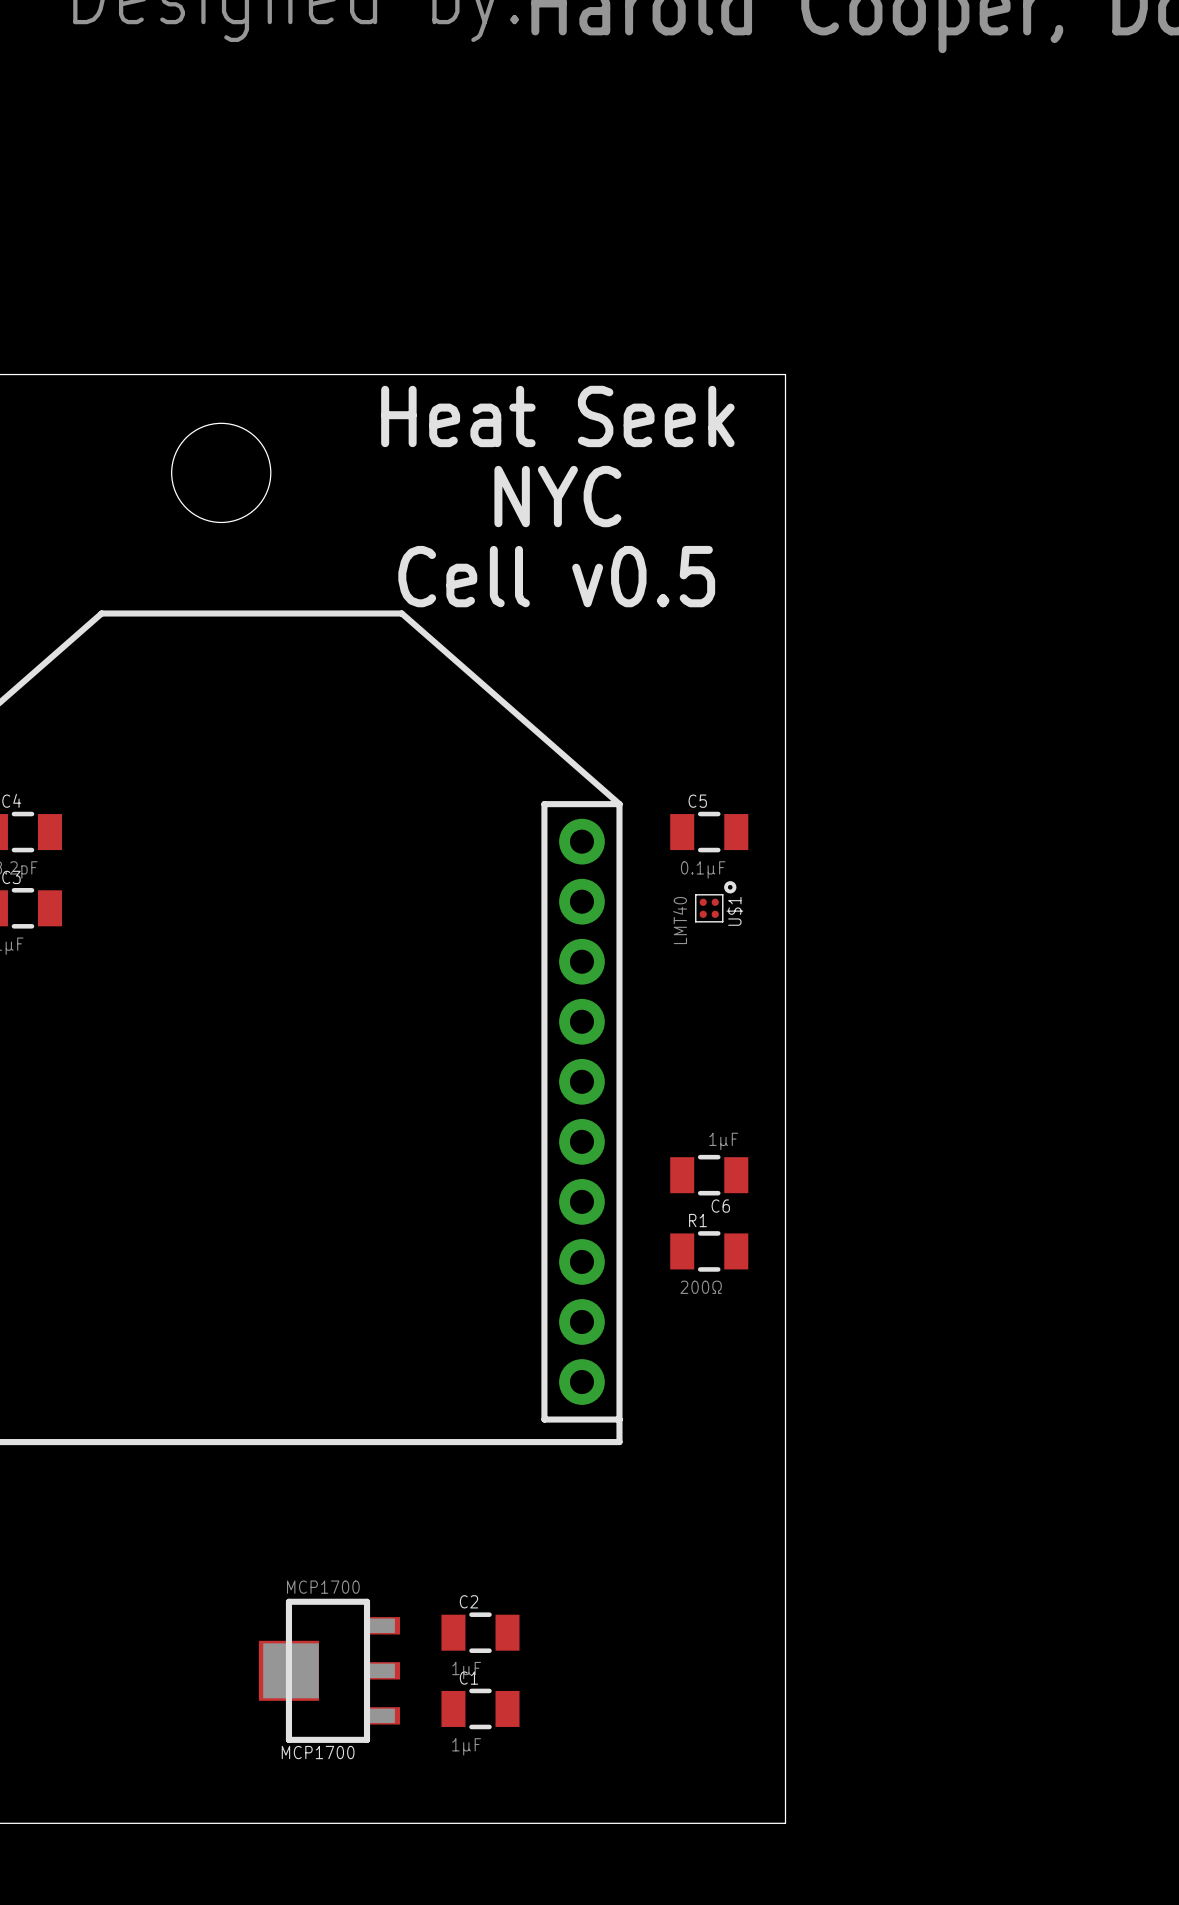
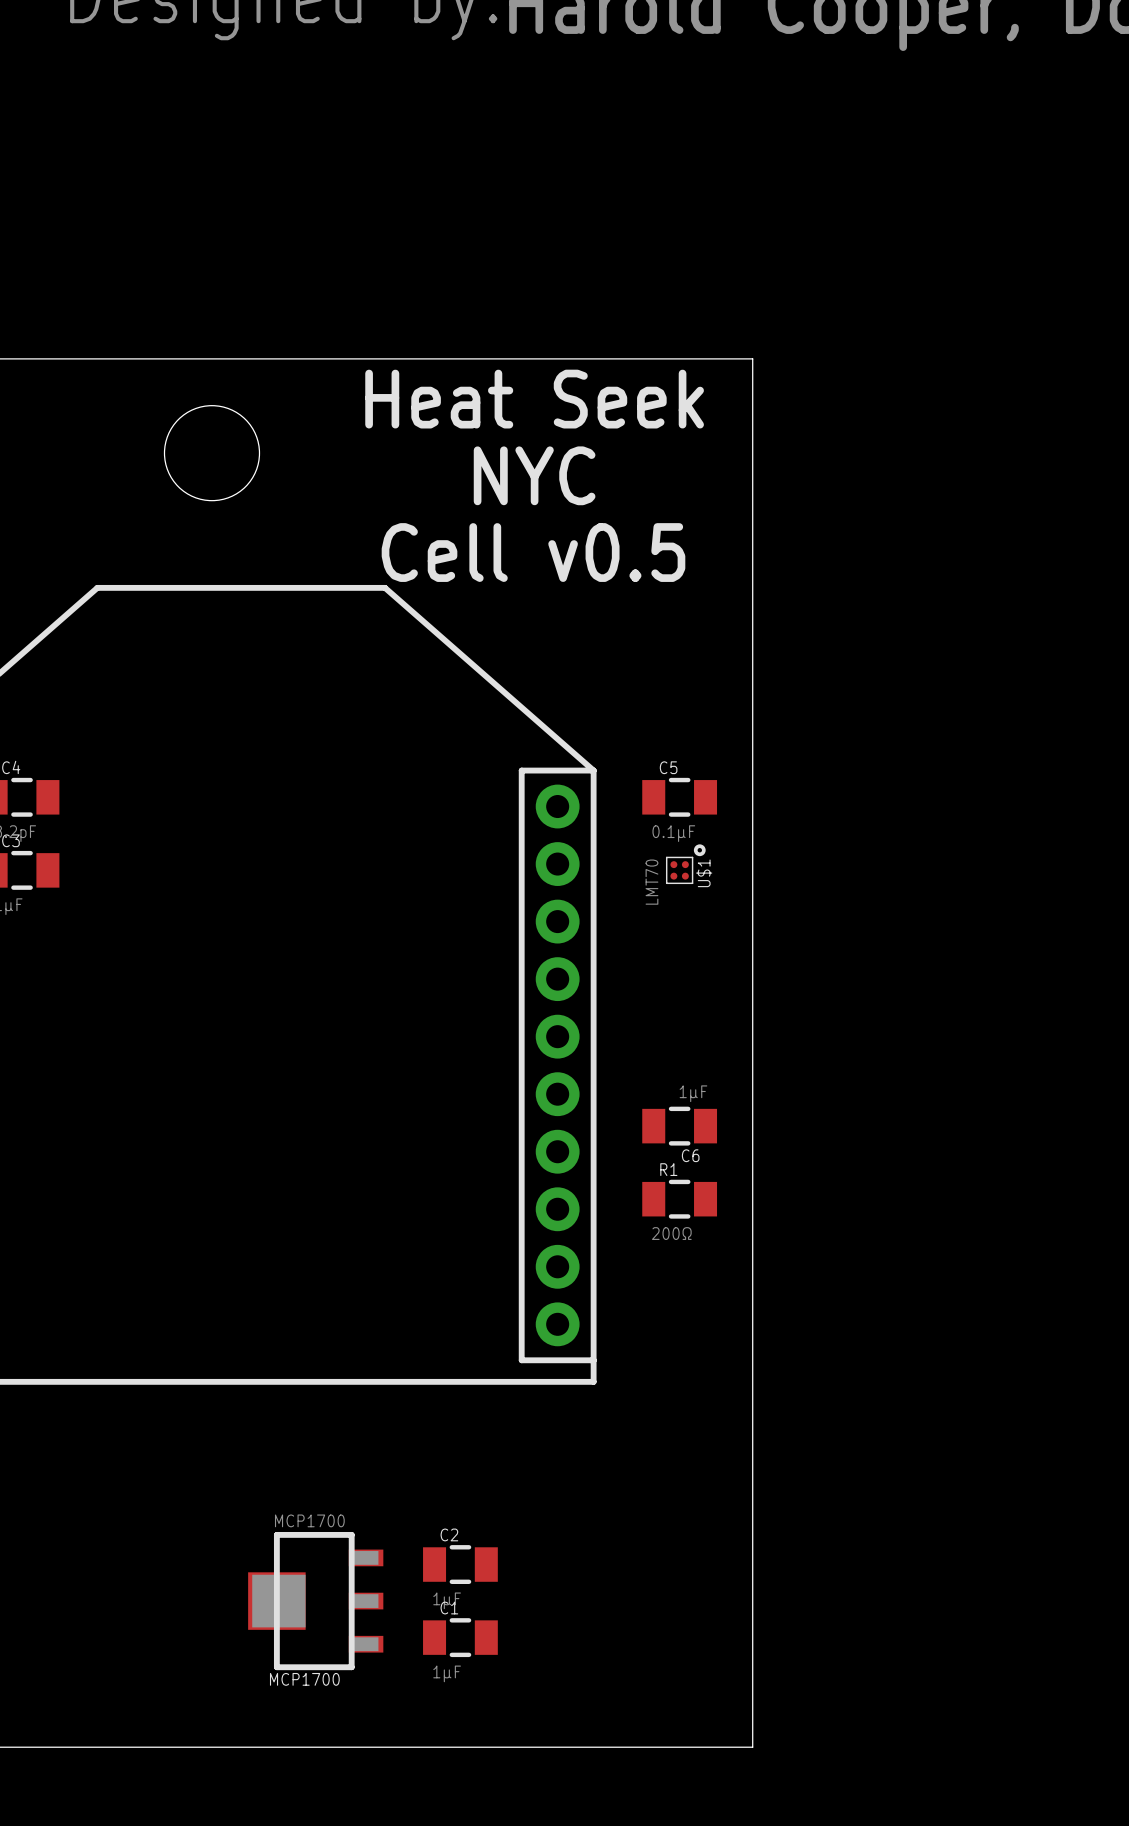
U$1 value: LMT40 (680, 920) -> LMT70 (651, 882)

